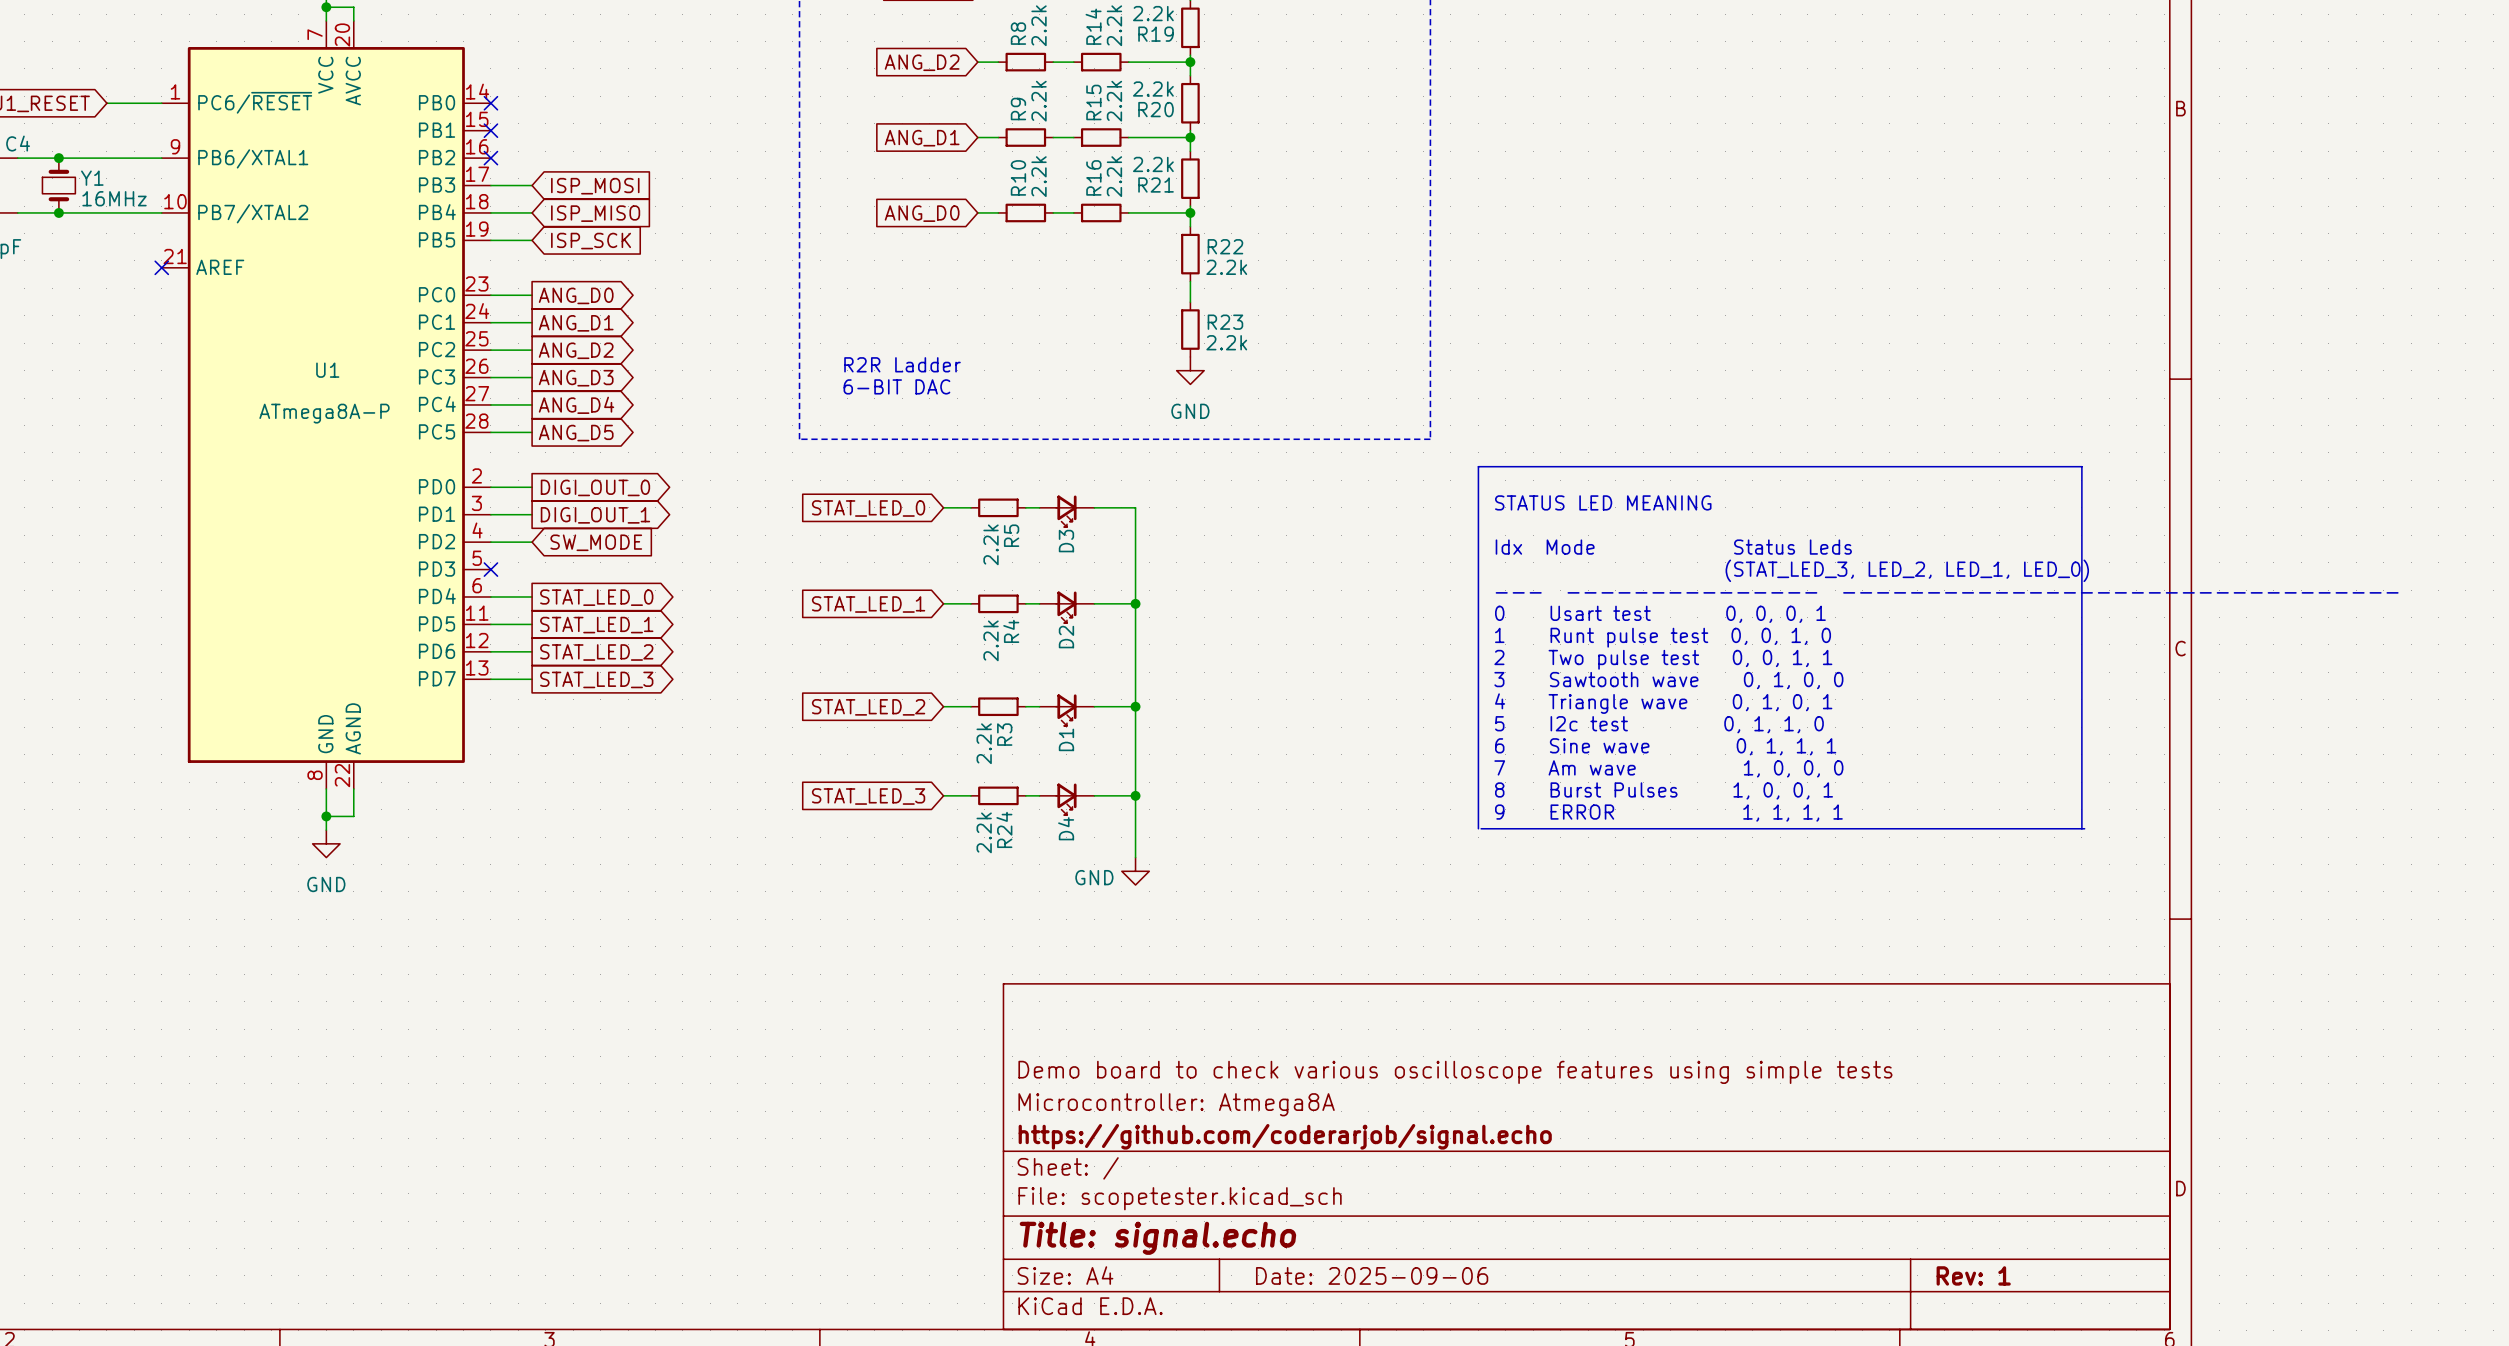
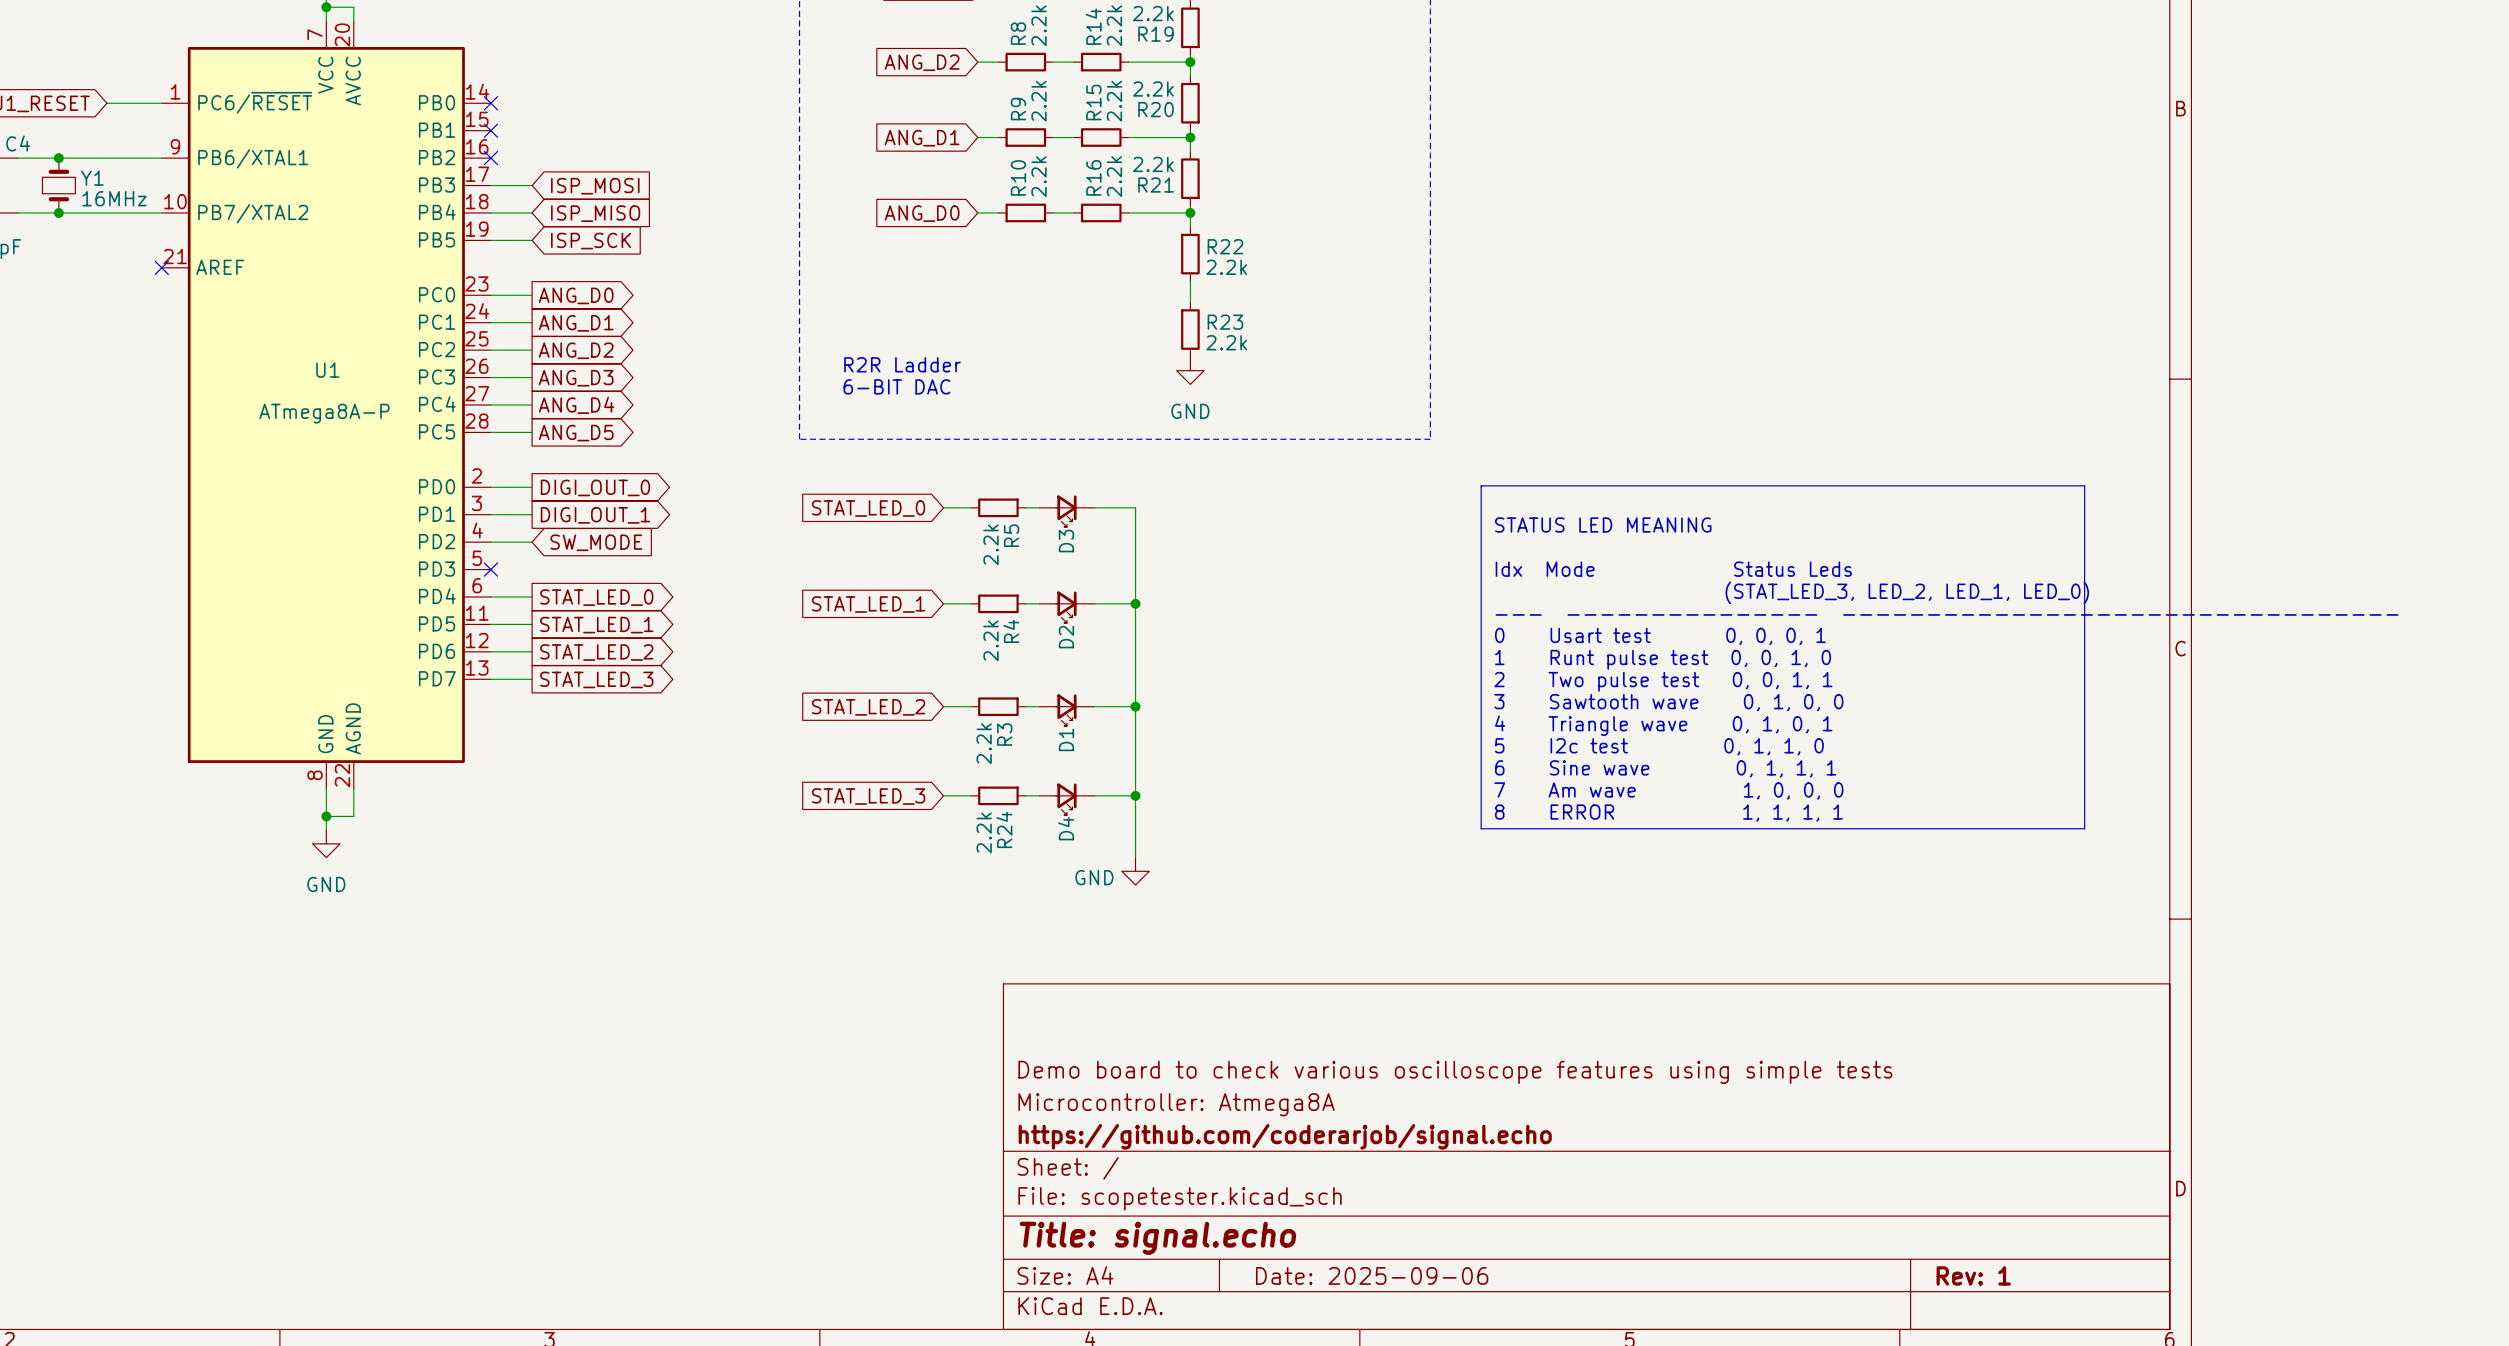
text position: STATUS LED MEANING (1603, 502) -> STATUS LED MEANING (1603, 525)
text: Idx Mode Status Leds (1673, 547) -> none
text: (STAT_LED_3, LED_2, LED_1, LED_0) (1907, 570) -> Idx Mode Status Leds (1673, 569)
text: --- --------------- --------------------------------- (1947, 592) -> (STAT_LED_3, LED_2, LED_1, LED_0) (1907, 592)
text: 0 Usart test 0, 0, 0, 1 (1660, 614) -> --- --------------- --------------------------------- (1947, 614)
text: 1 Runt pulse test 0, 0, 1, 0 (1663, 637) -> 0 Usart test 0, 0, 0, 1 (1660, 636)
text: 2 Two pulse test 0, 0, 1, 1 (1663, 659) -> 1 Runt pulse test 0, 0, 1, 0 (1663, 659)
text: 3 Sawtooth wave 0, 1, 0, 0 (1668, 680) -> 2 Two pulse test 0, 0, 1, 1 (1663, 681)
text: 4 Triangle wave 0, 1, 0, 1 (1663, 703) -> 3 Sawtooth wave 0, 1, 0, 0 (1668, 702)
text: 5 I2c test 0, 1, 1, 0 (1659, 724) -> 4 Triangle wave 0, 1, 0, 1 (1663, 725)
text: 6 Sine wave 0, 1, 1, 1 (1665, 746) -> 5 I2c test 0, 1, 1, 0 (1659, 746)
text: 7 Am wave 1, 0, 0, 0 (1668, 768) -> 6 Sine wave 0, 1, 1, 1 (1665, 768)
text: 8 Burst Pulses 1, 0, 0, 1 (1664, 790) -> 7 Am wave 1, 0, 0, 0 (1668, 790)
text: 9 ERROR 1, 1, 1, 1 (1668, 813) -> 8 ERROR 1, 1, 1, 1 (1668, 813)
line: (1478, 828) (1478, 466) (2081, 466) (2081, 828) -> none
line: none -> (1481, 828) (1481, 485) (2084, 485) (2084, 828)

